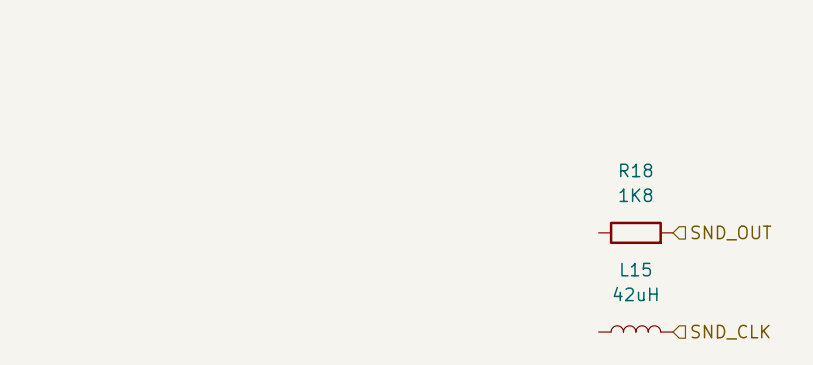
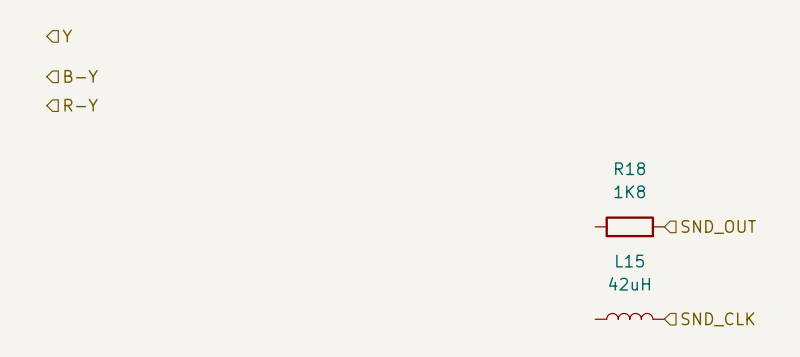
hierarchical label: none -> Y (67, 35)
hierarchical label: none -> B-Y (81, 76)
hierarchical label: none -> R-Y (81, 105)

